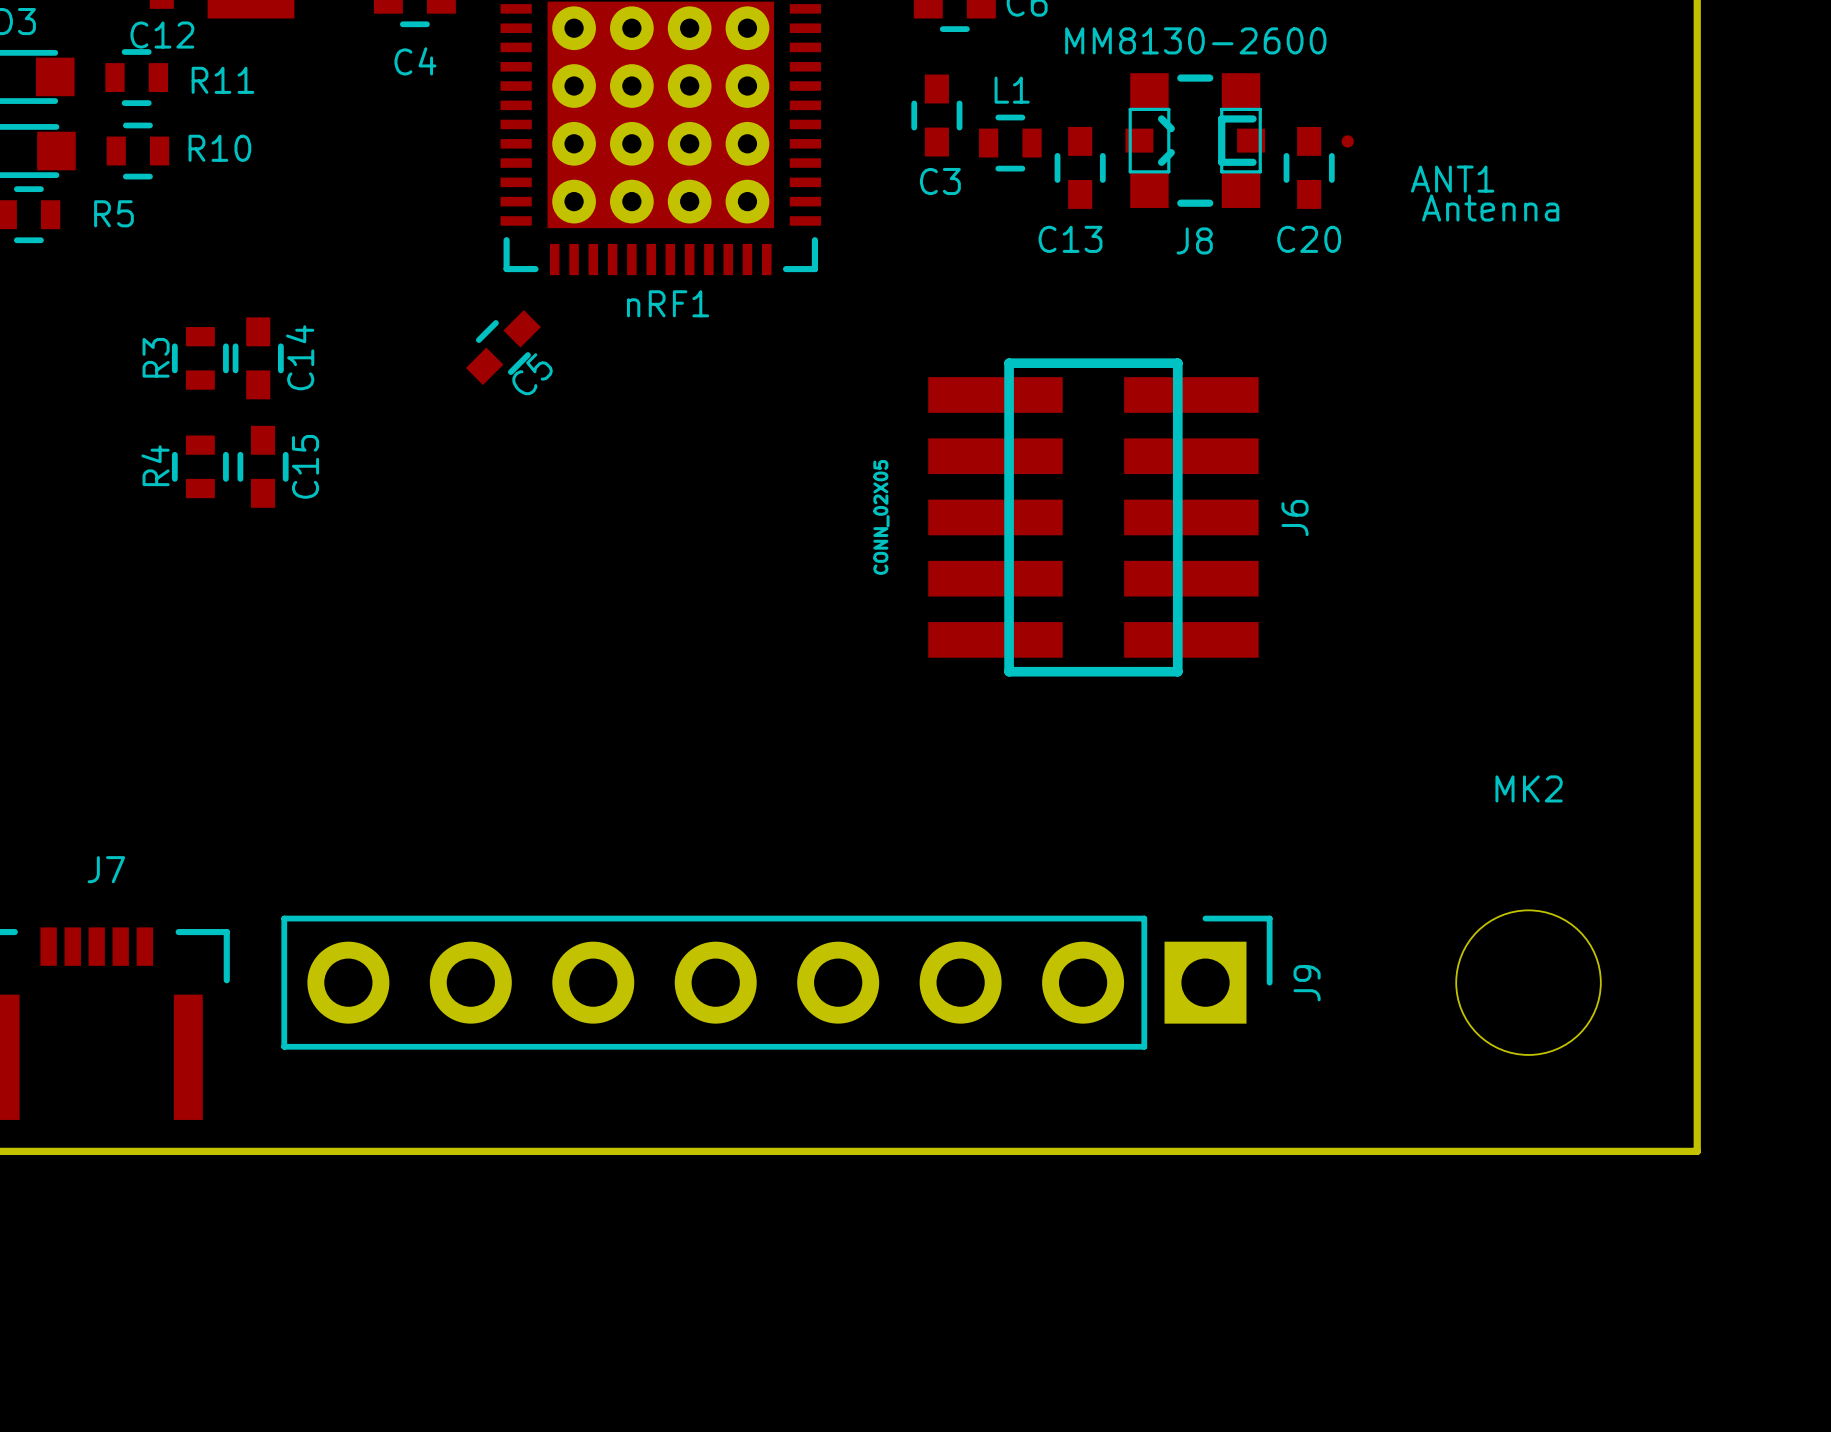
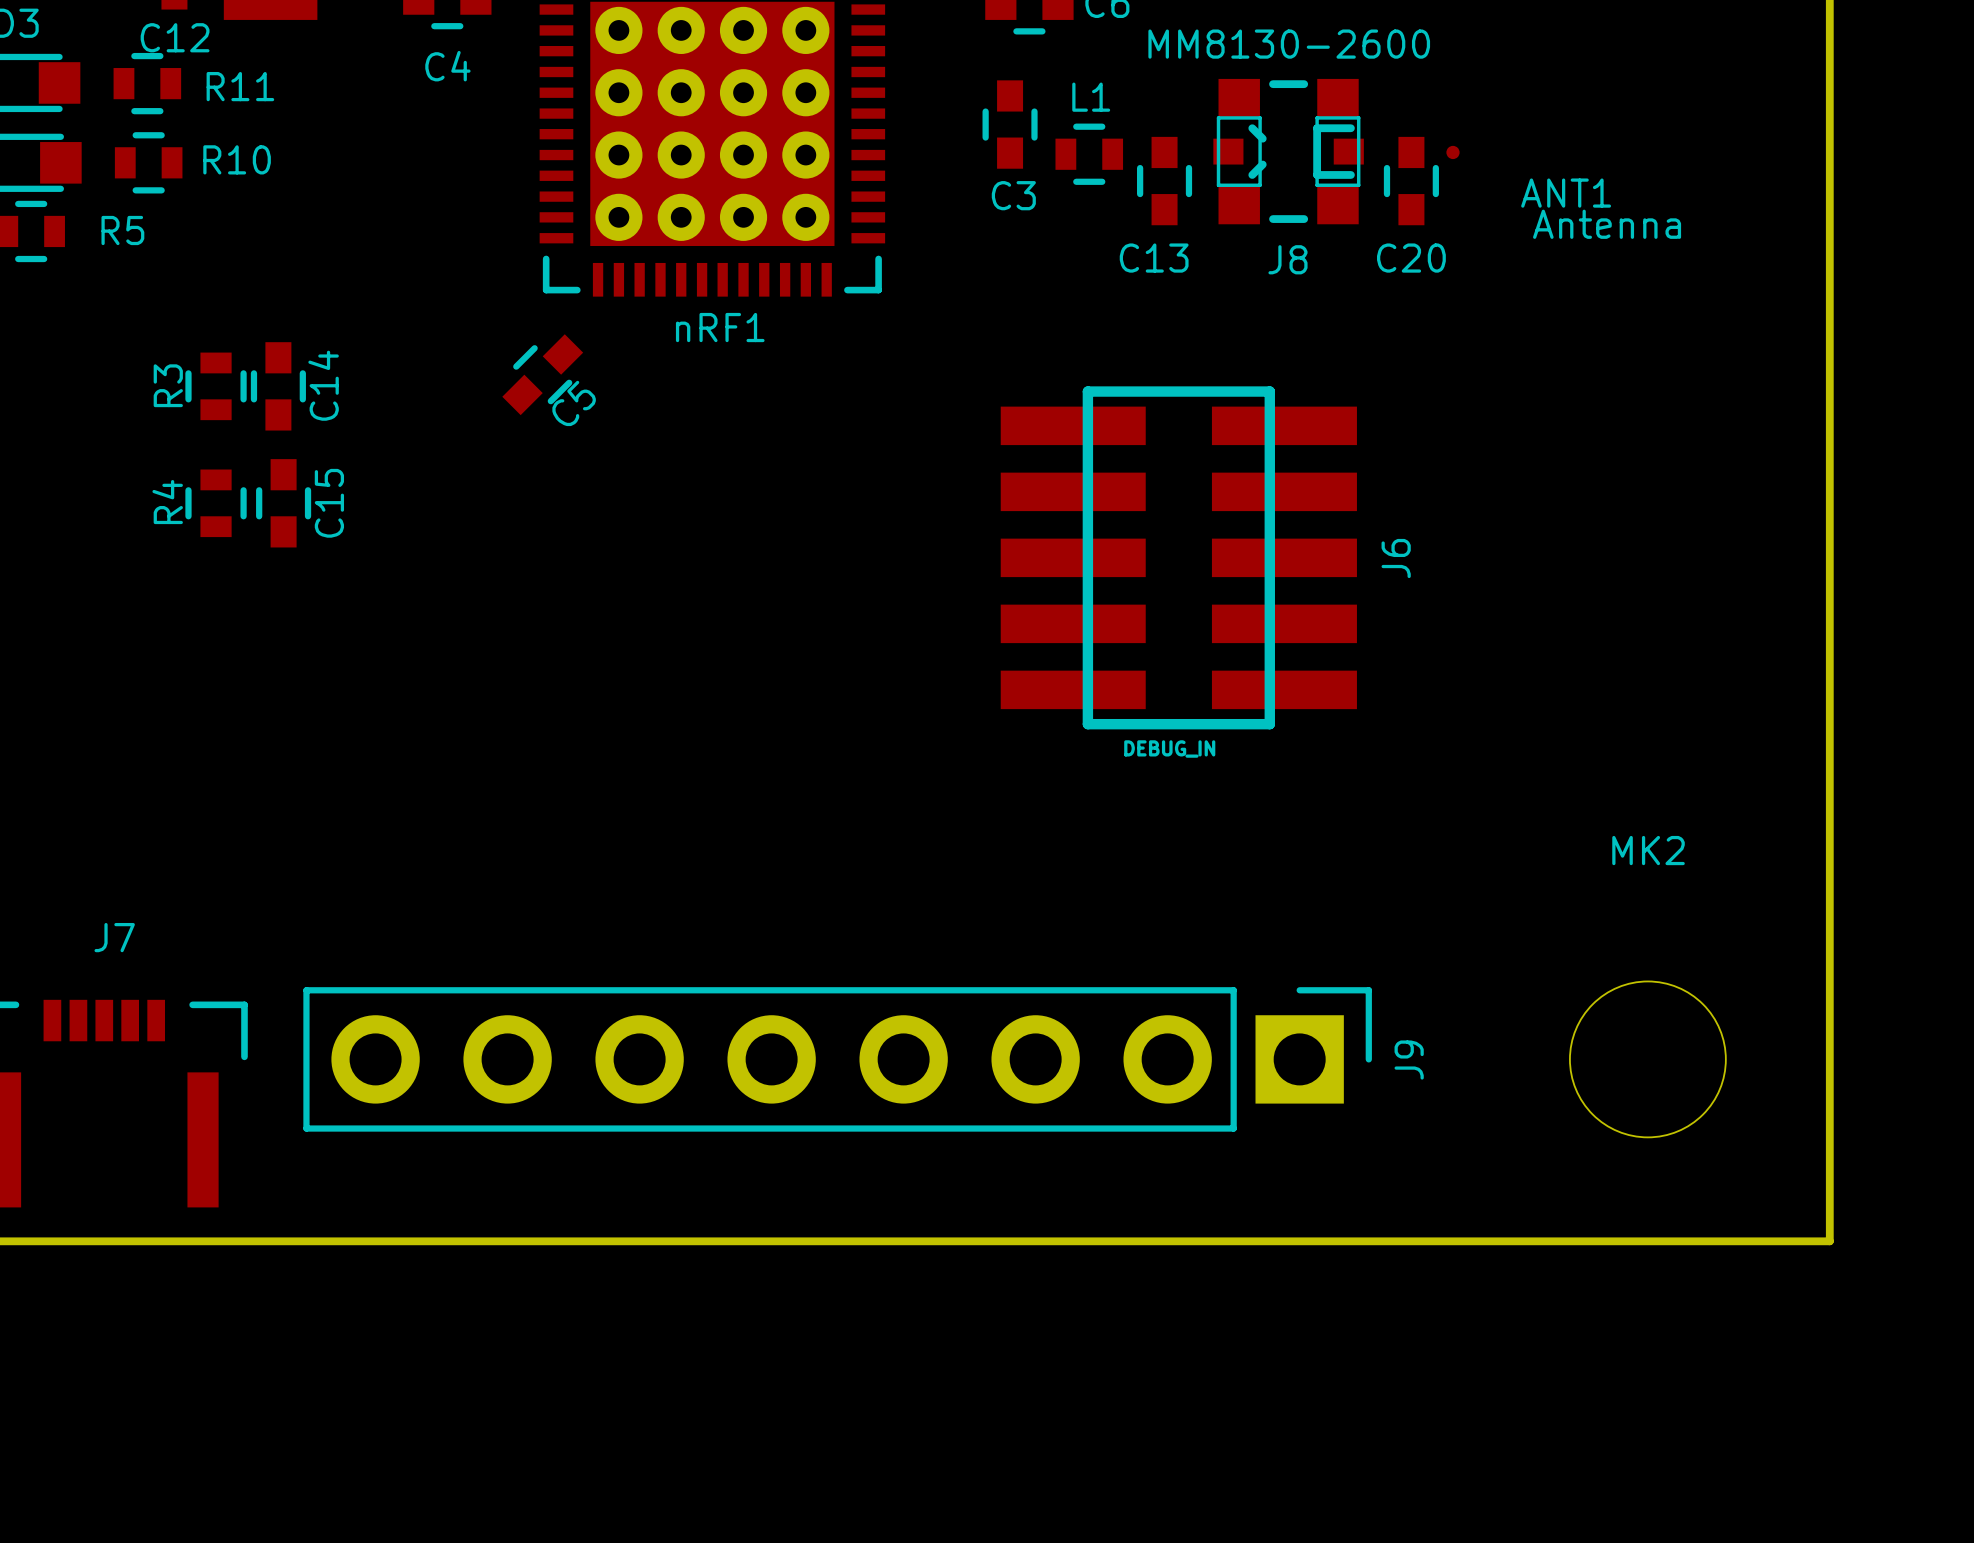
J6 value: CONN_02X05 (881, 517) -> DEBUG_IN (1169, 749)

